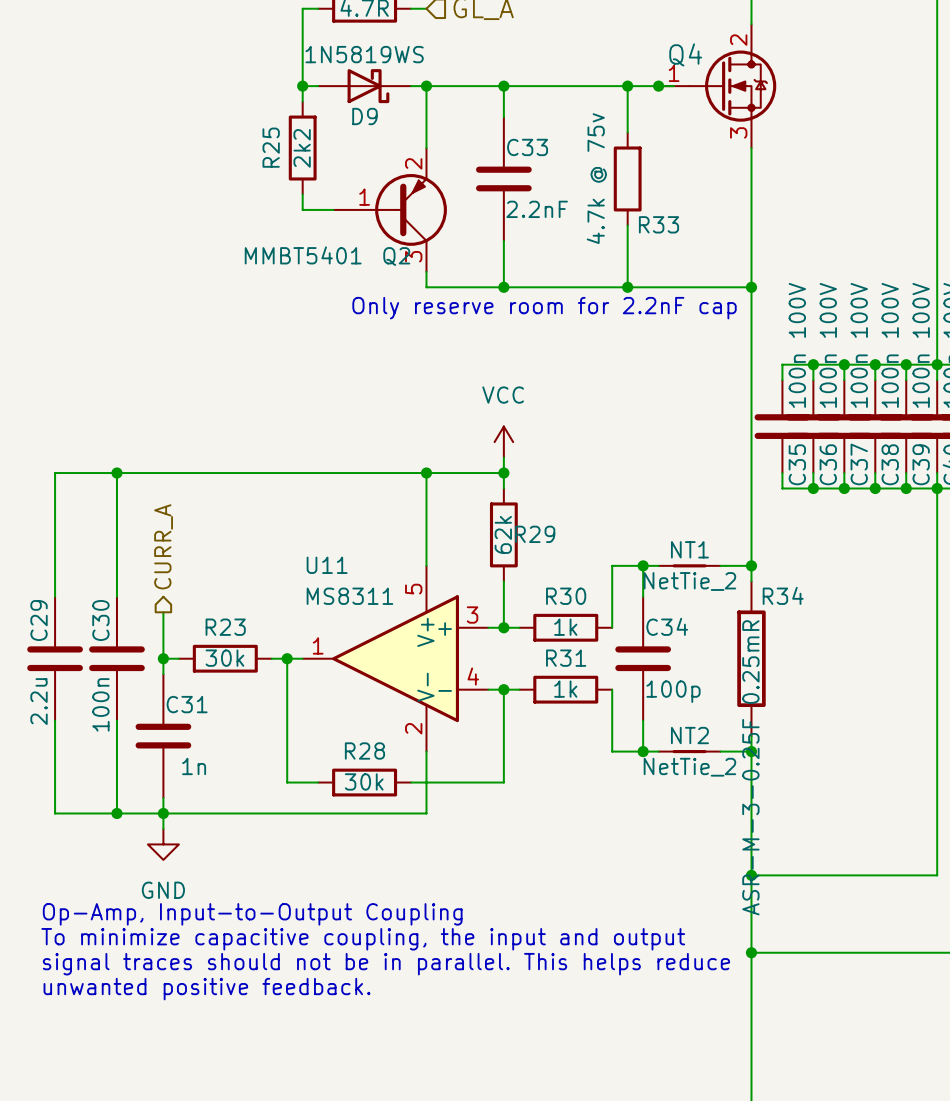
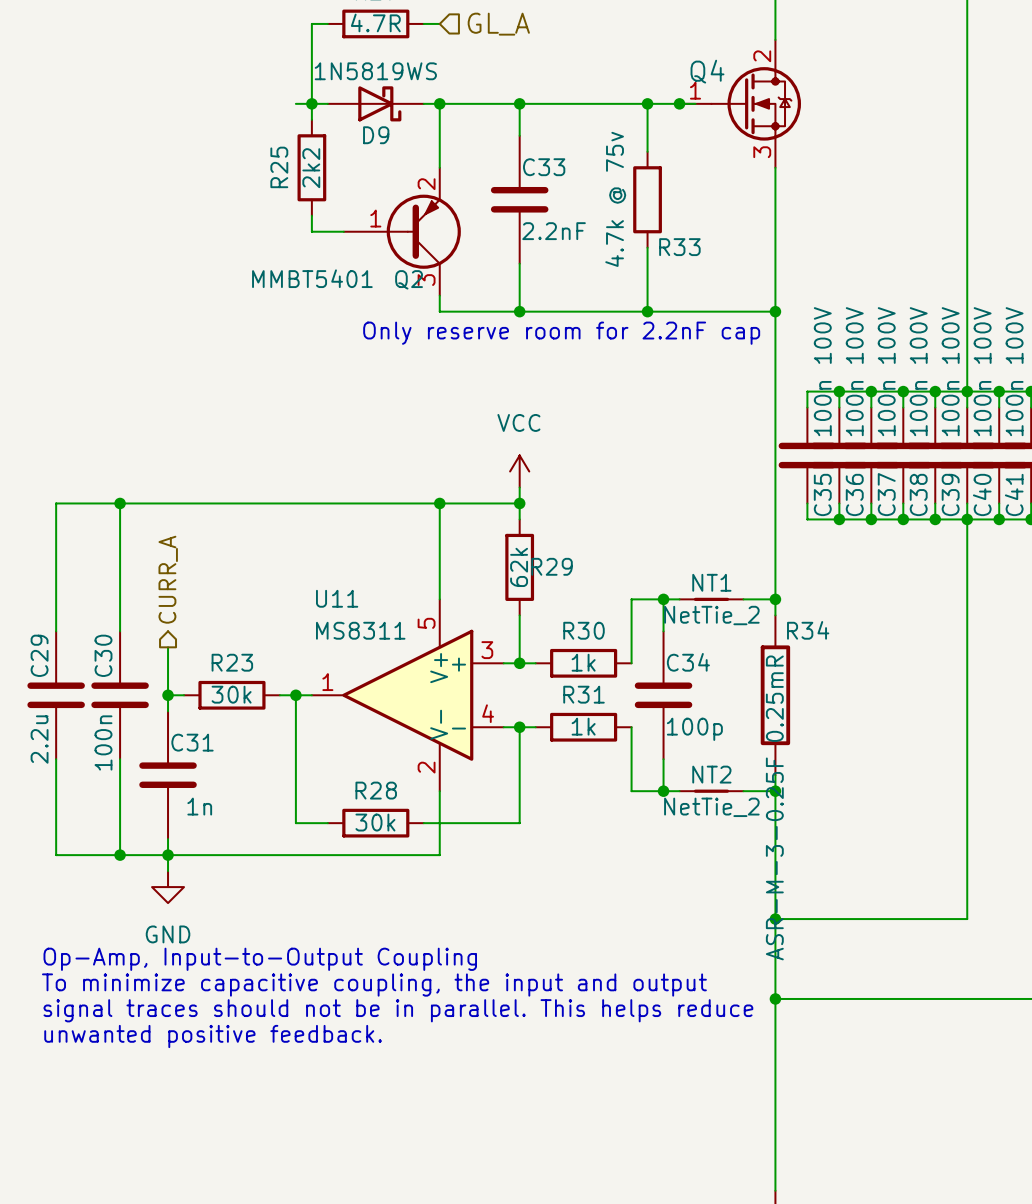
wire: none -> (295, 103) (311, 103)

